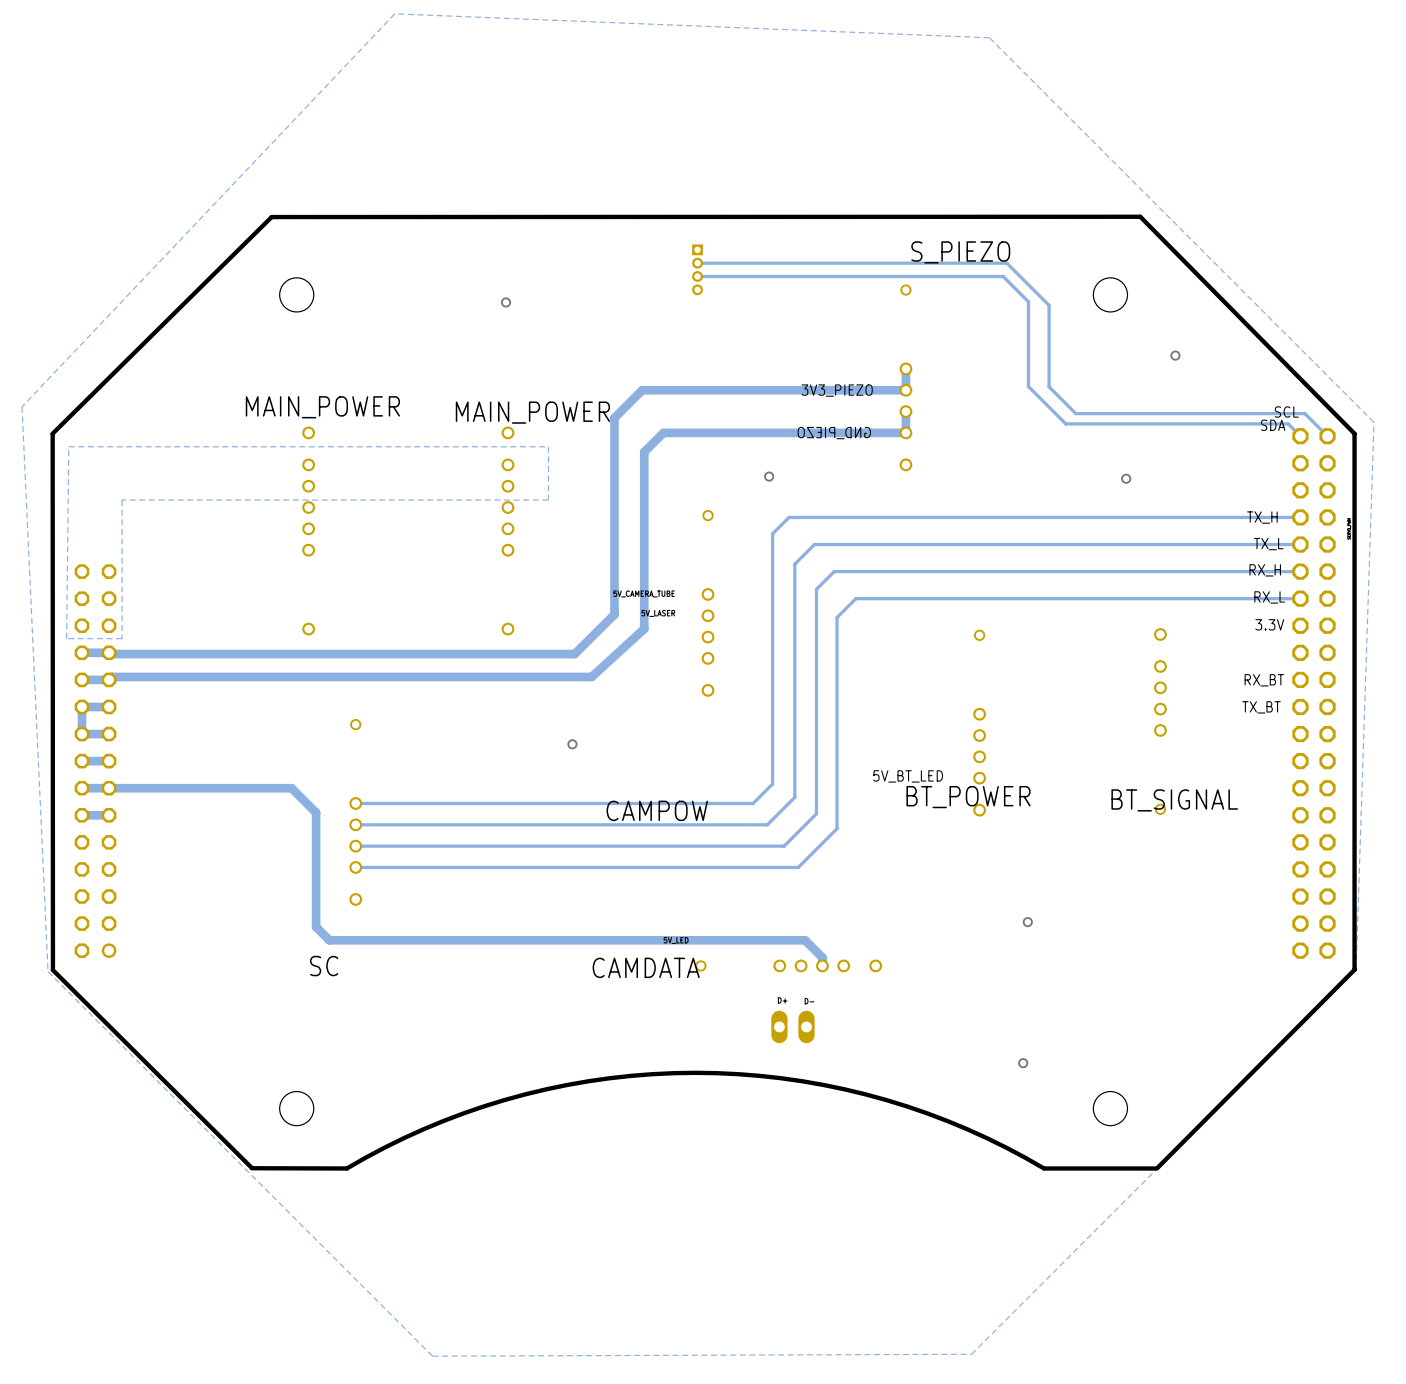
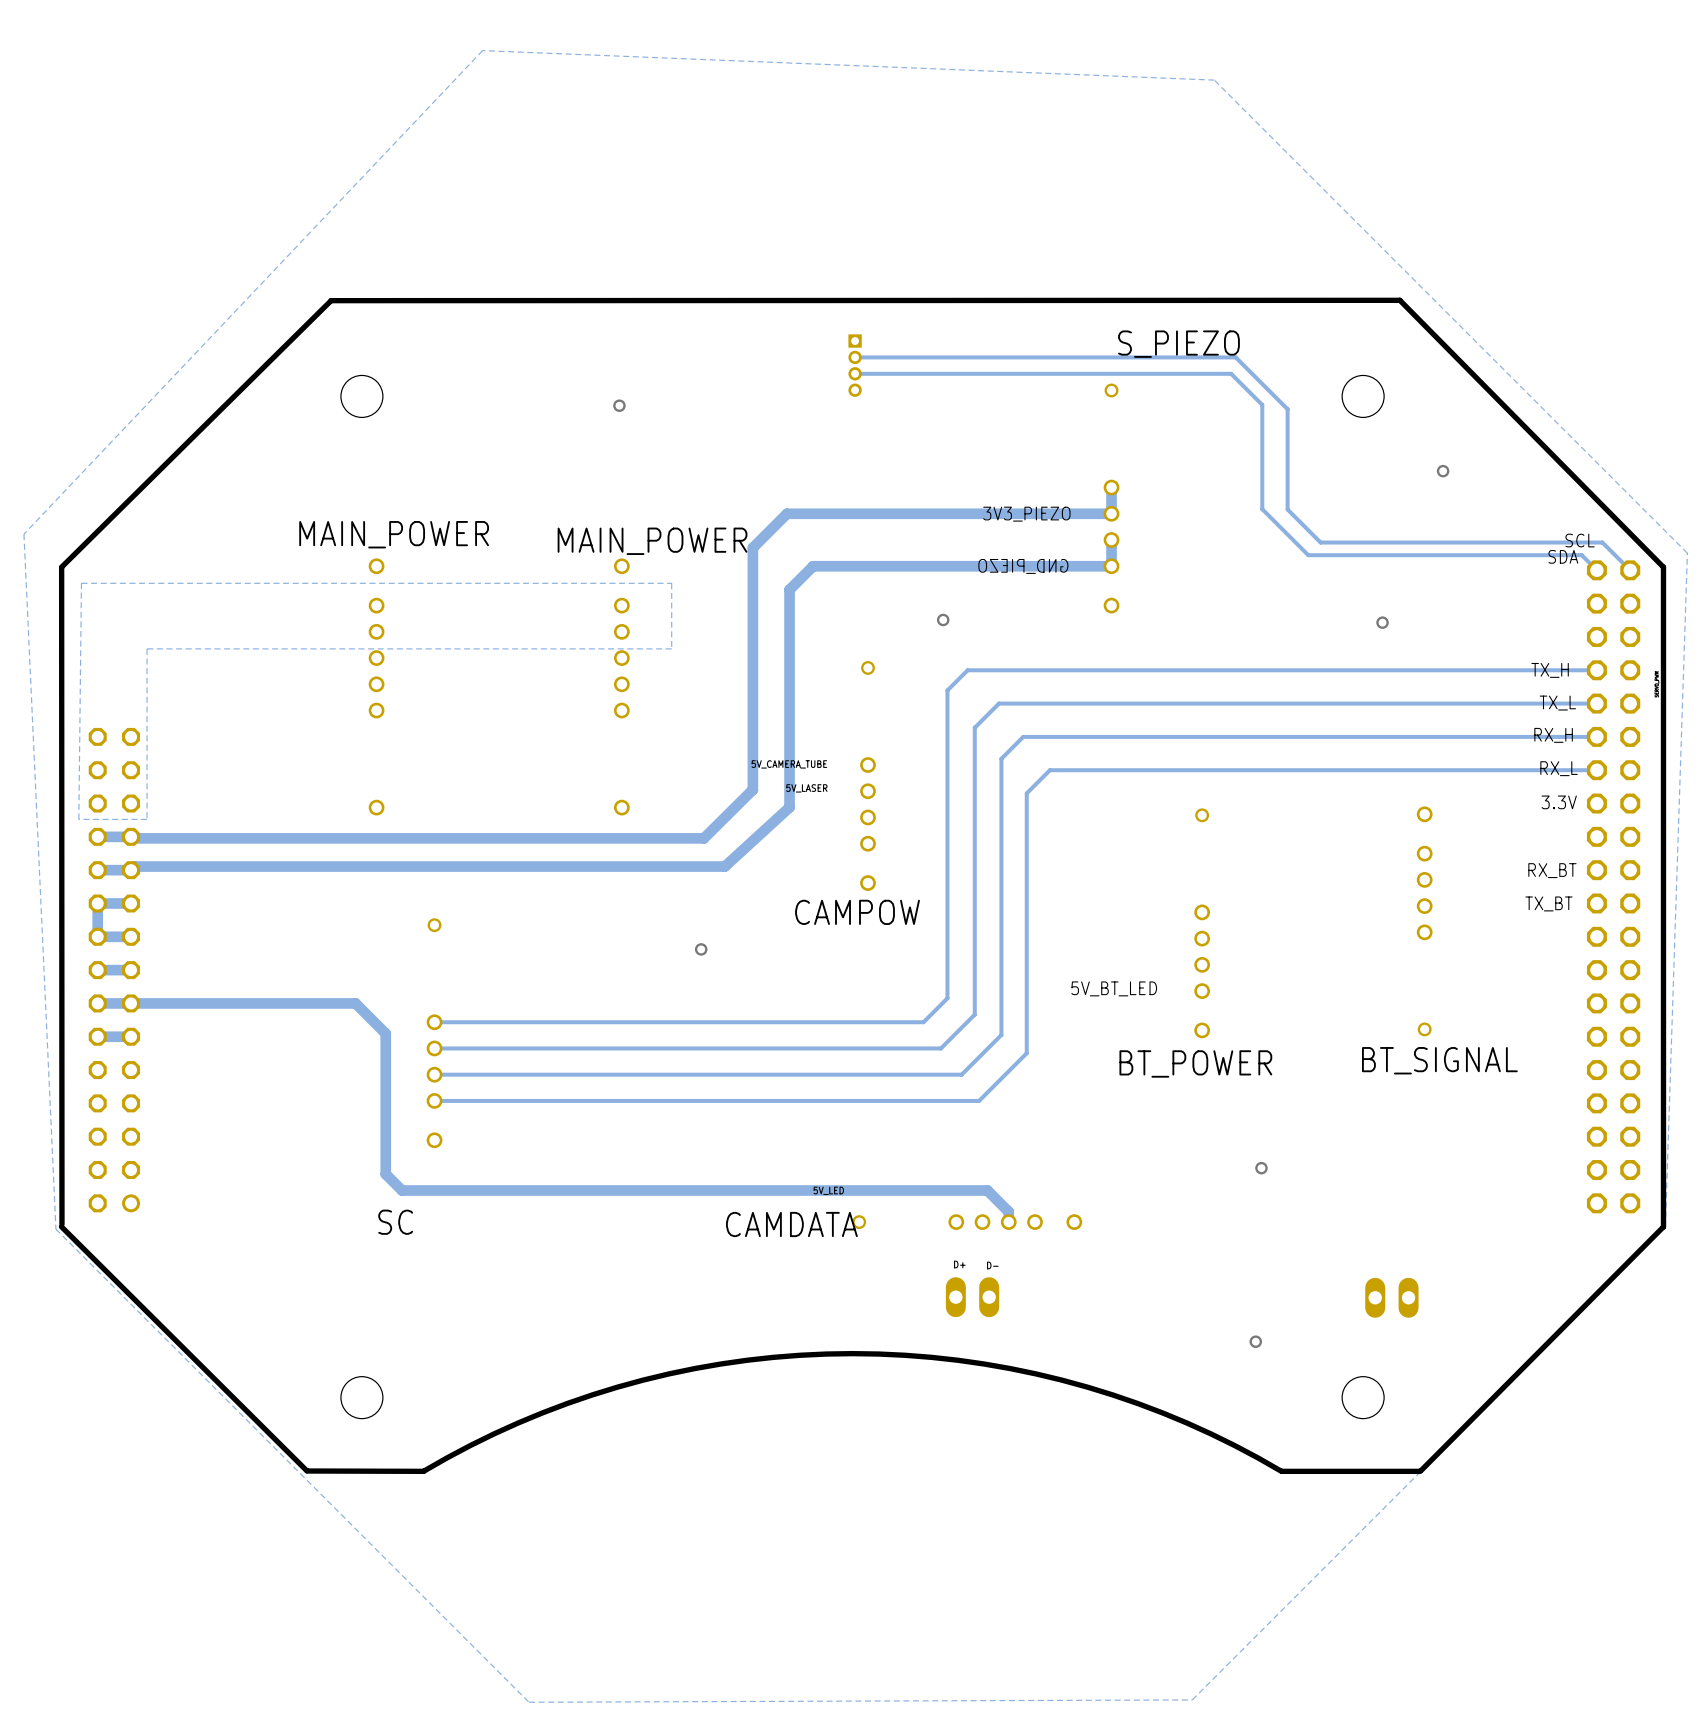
text position: BT_POWER (968, 797) -> BT_POWER (1195, 1063)
text position: BT_SIGNAL (1174, 800) -> BT_SIGNAL (1439, 1060)
text position: CAMPOW (657, 810) -> CAMPOW (857, 912)
part: none -> (1391, 1297)

